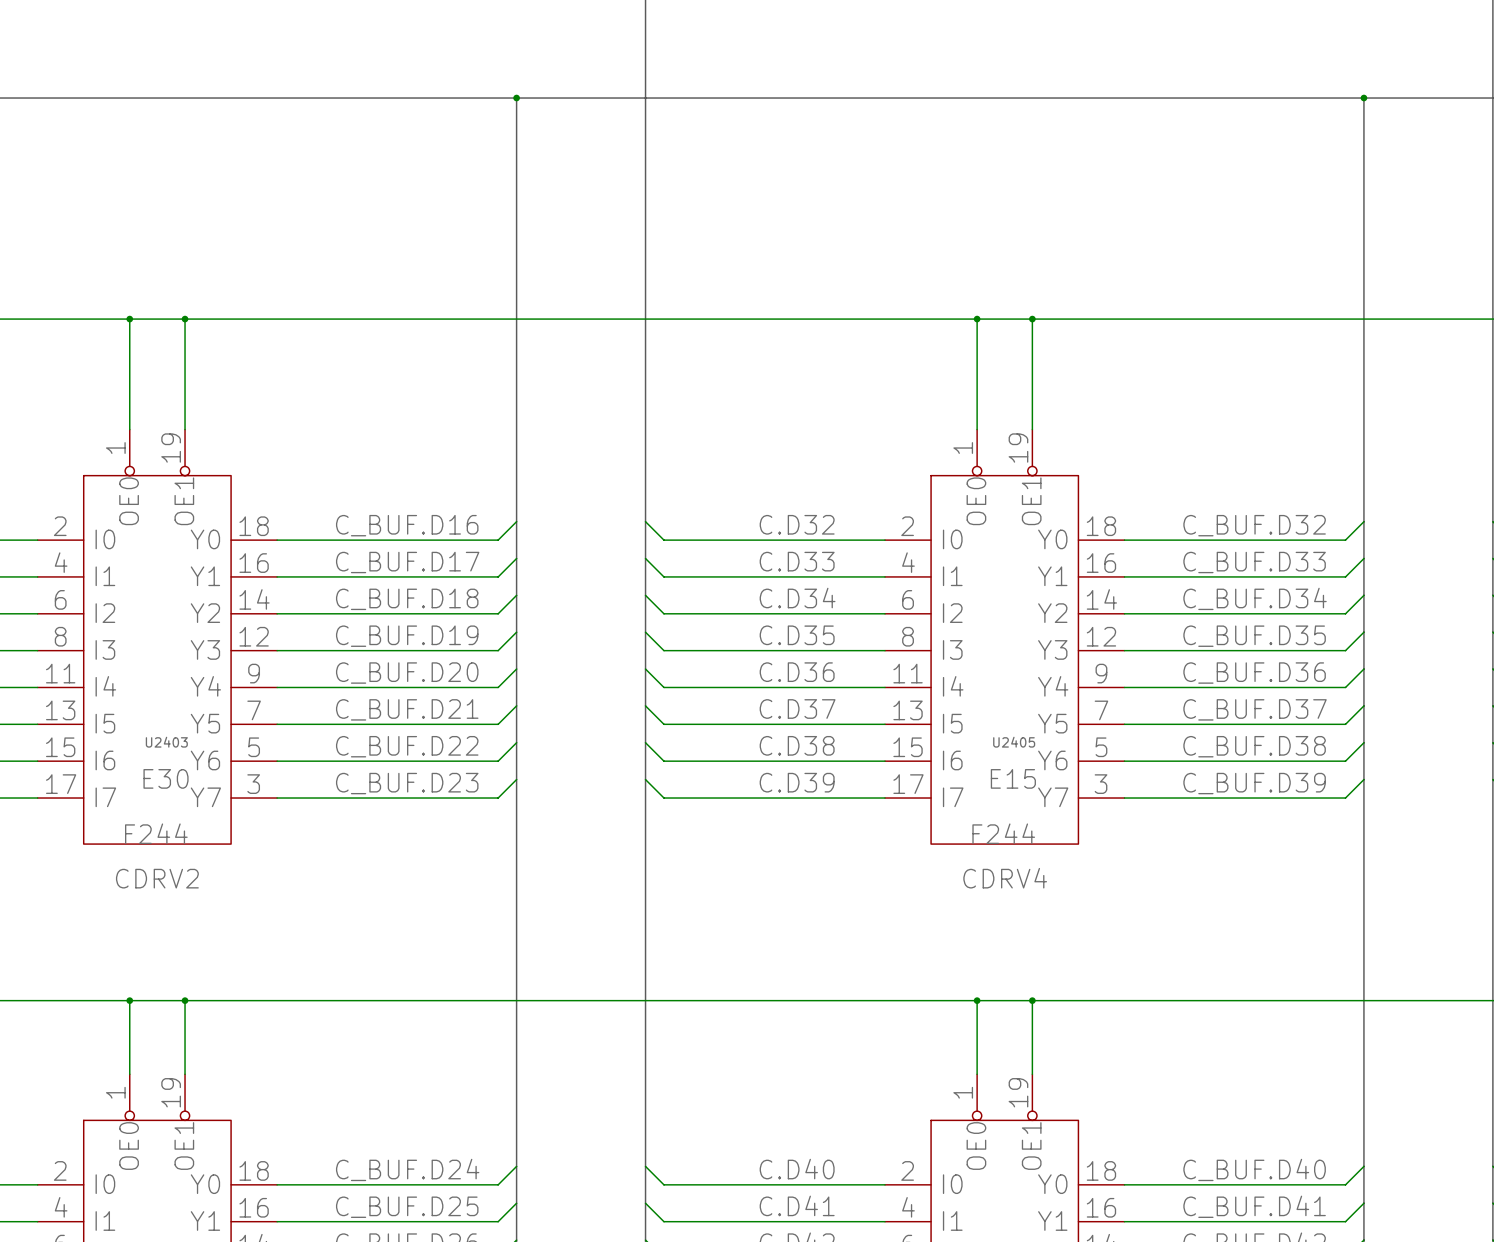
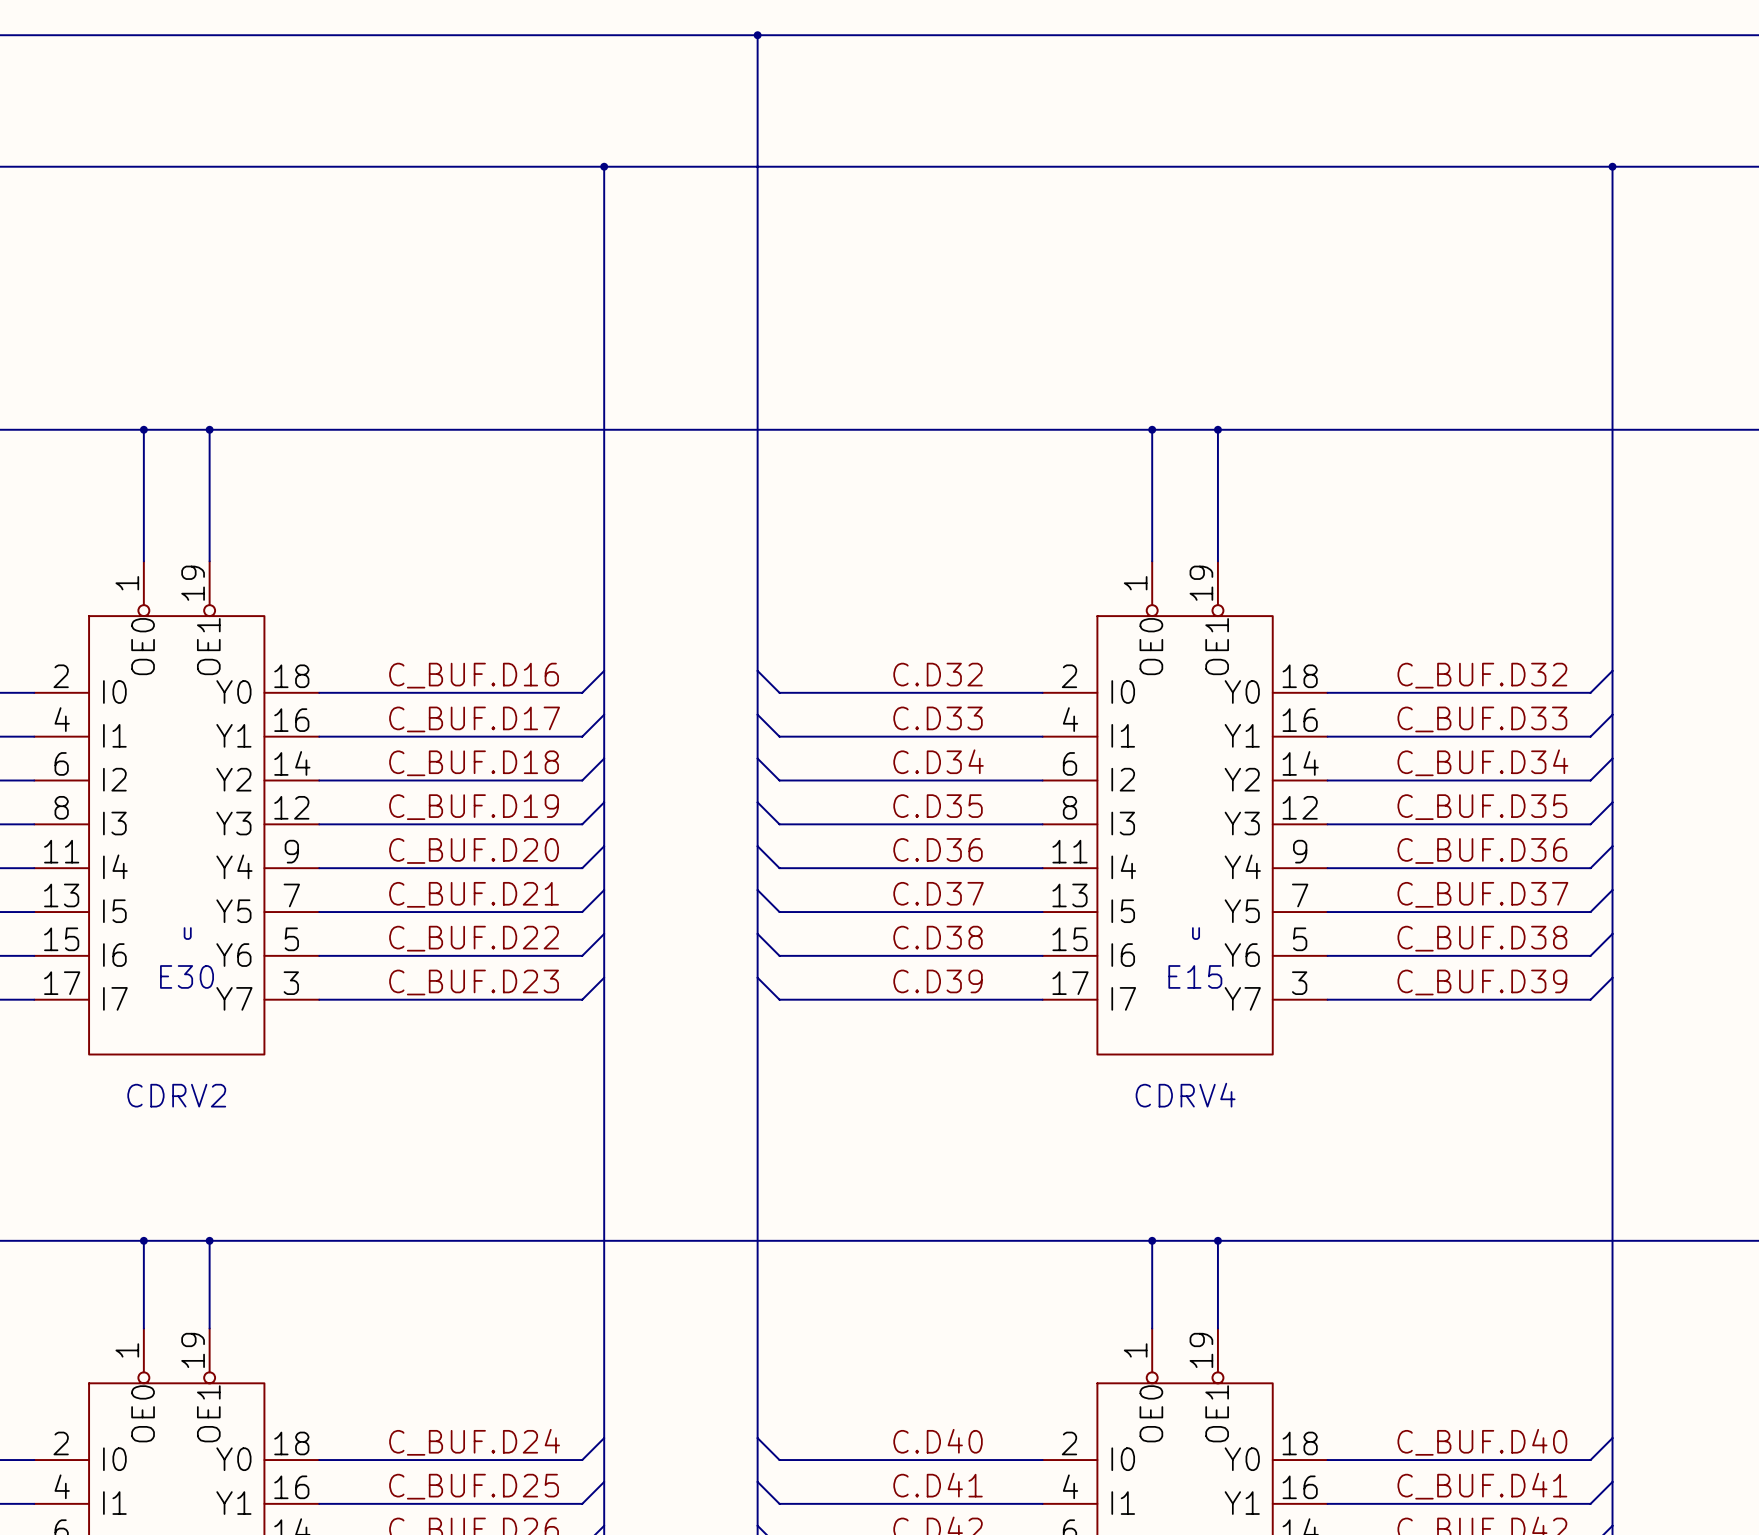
U2403 name: U2403 (166, 742) -> U (187, 933)
U2405 name: U2405 (1014, 742) -> U (1196, 933)
U2403 value: F244 (156, 833) -> none
U2405 value: F244 (1003, 833) -> none

